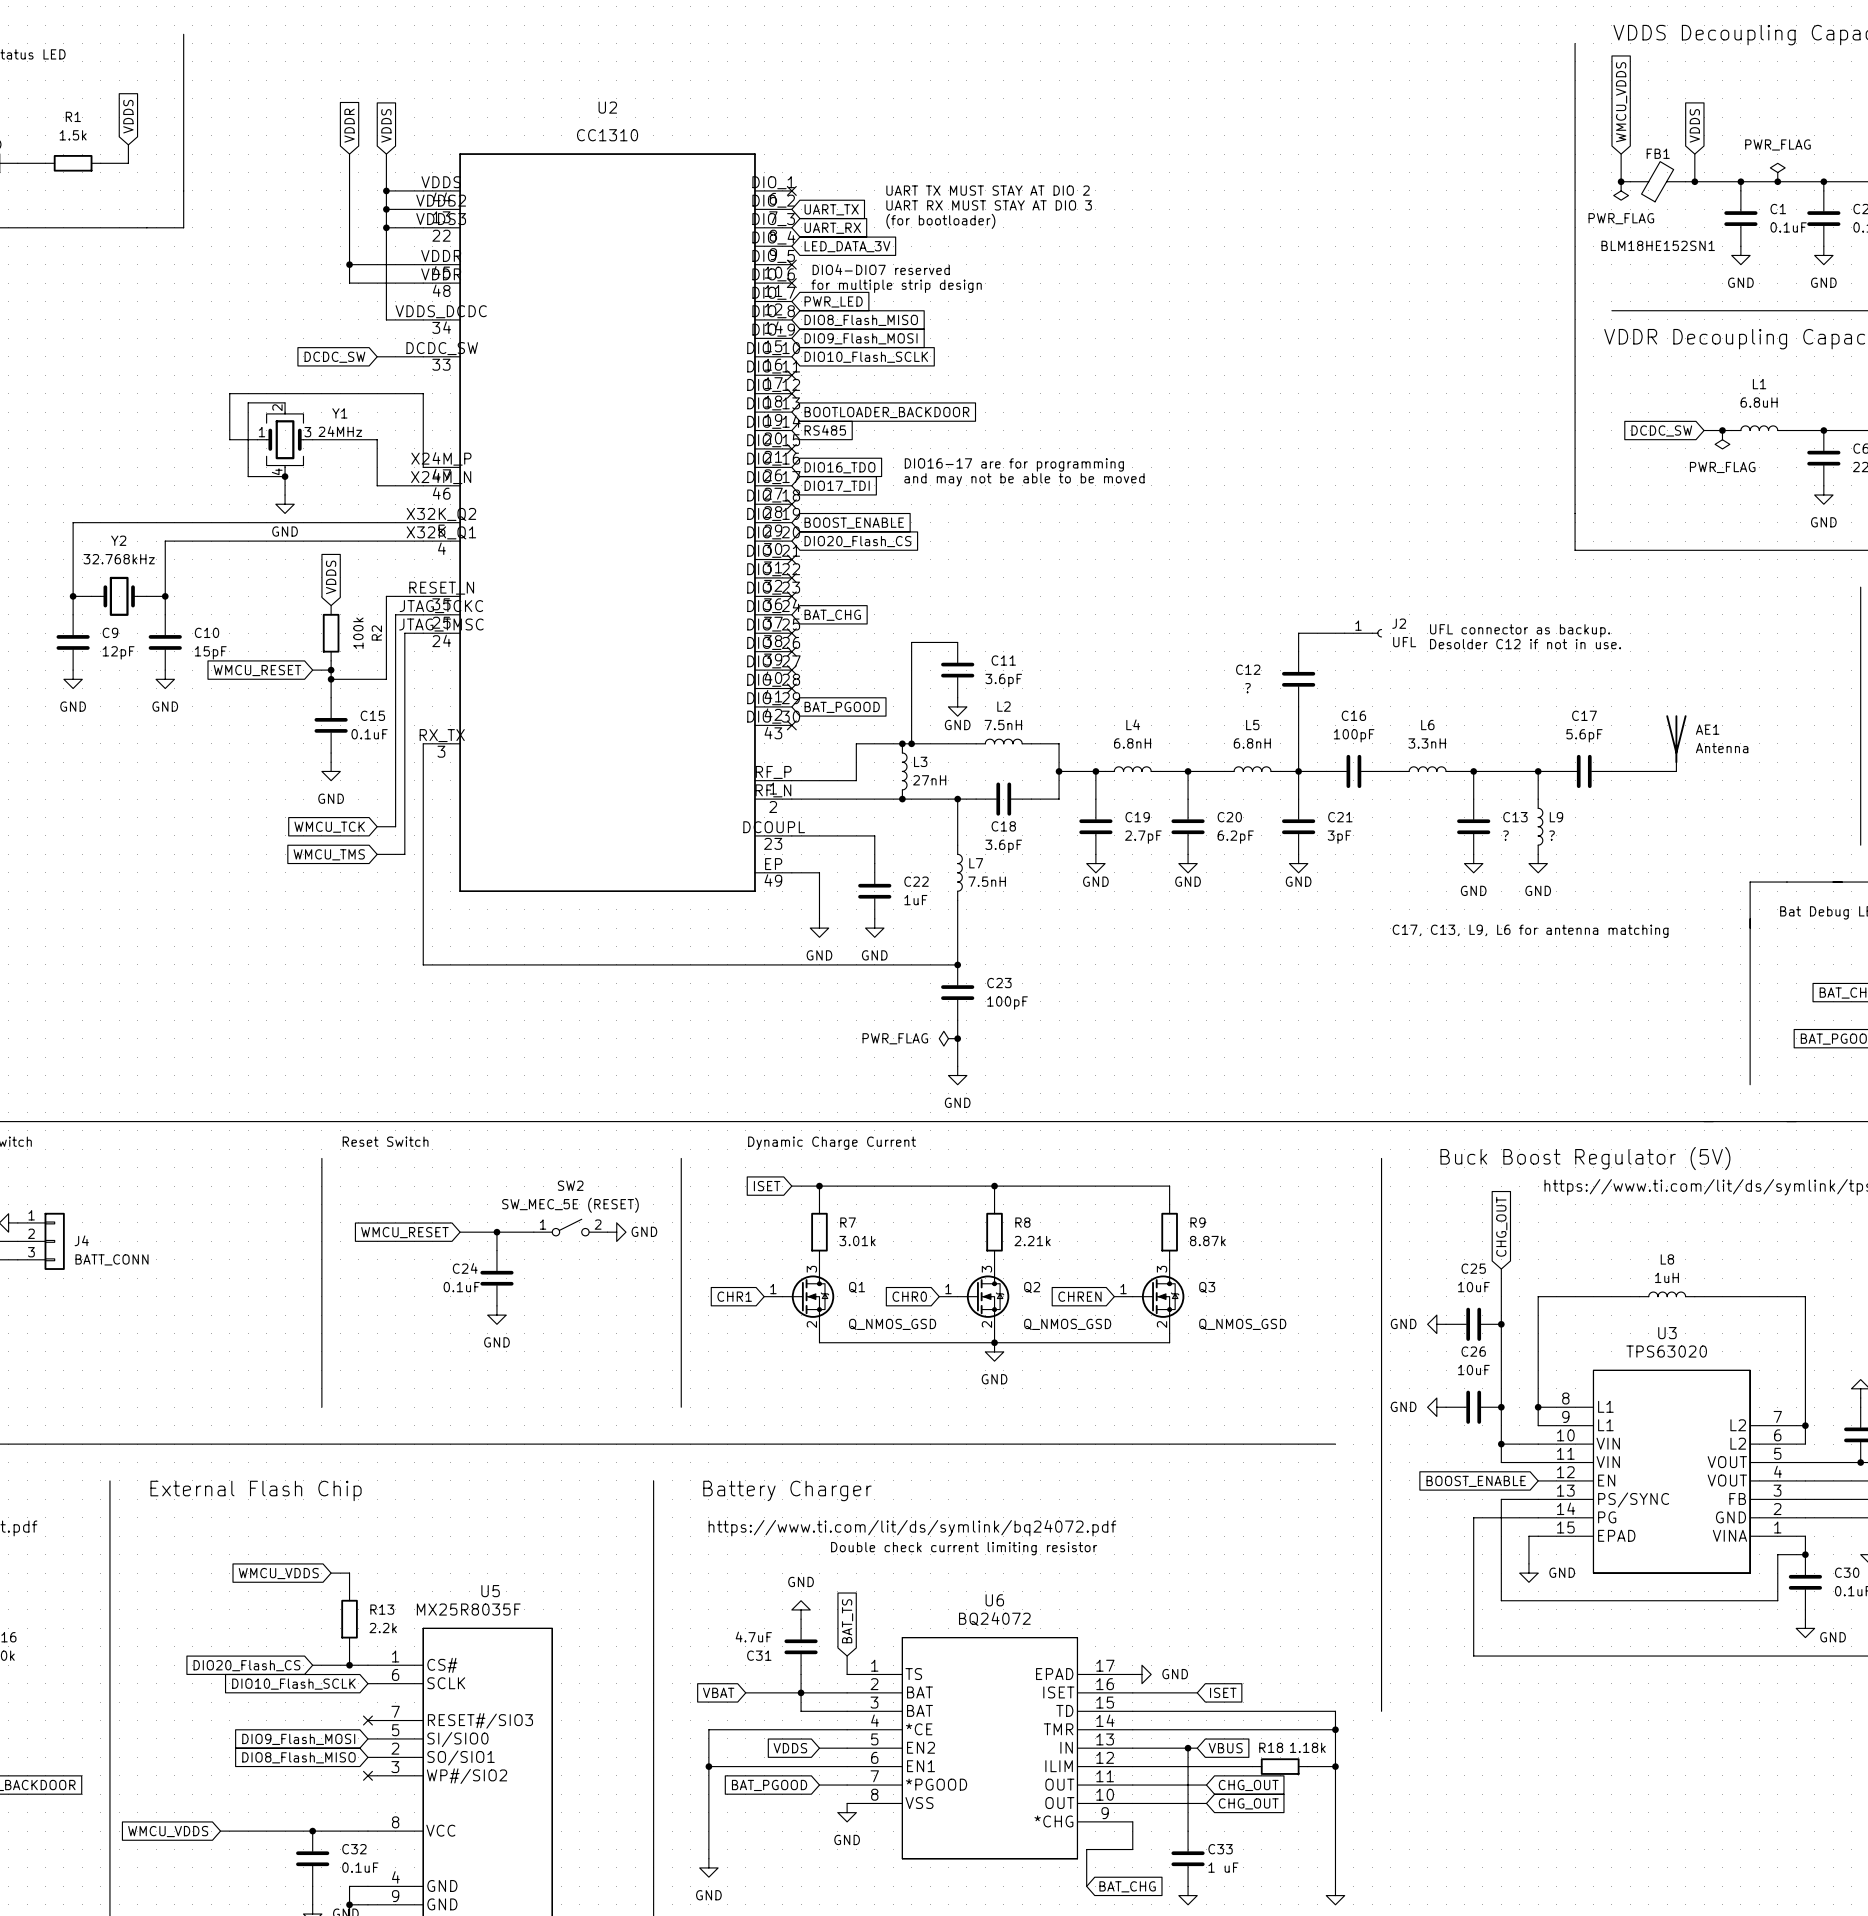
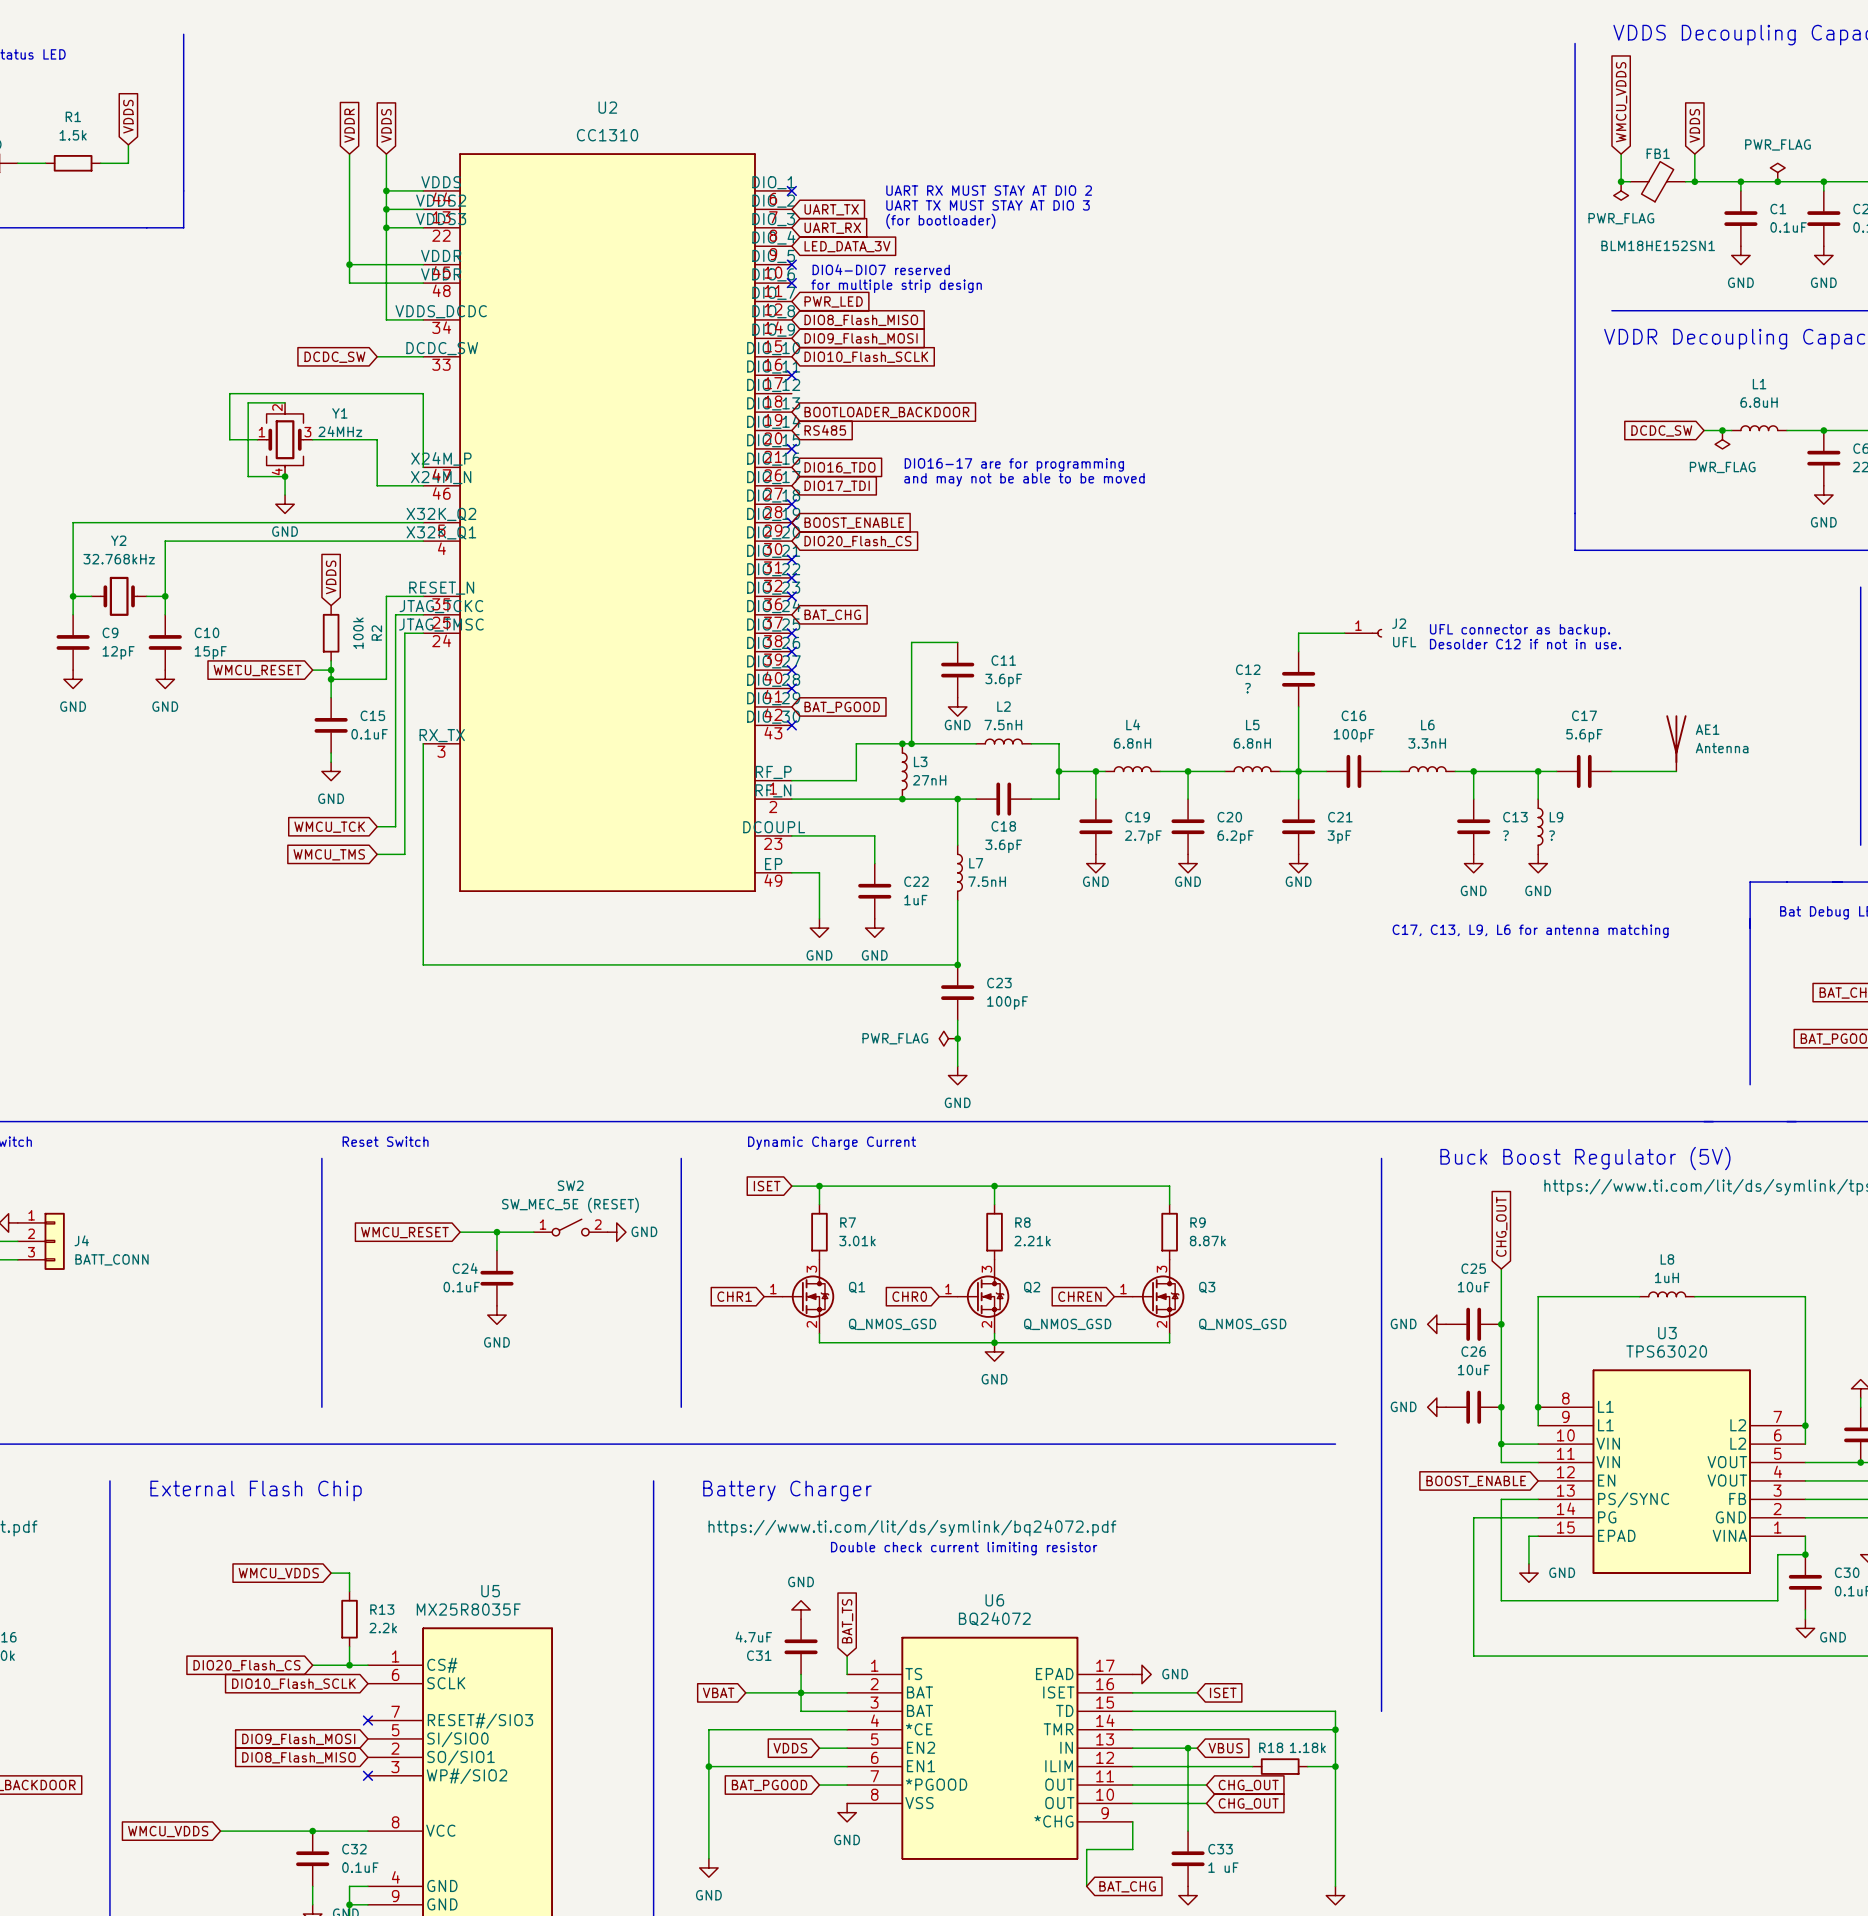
text: UART TX MUST STAY AT DIO 2 (988, 190) -> UART RX MUST STAY AT DIO 2 (989, 190)
text: UART RX MUST STAY AT DIO 3 (989, 205) -> UART TX MUST STAY AT DIO 3 (988, 205)
no-connect mark: (791, 393) -> none
no-connect mark: none -> (791, 522)

